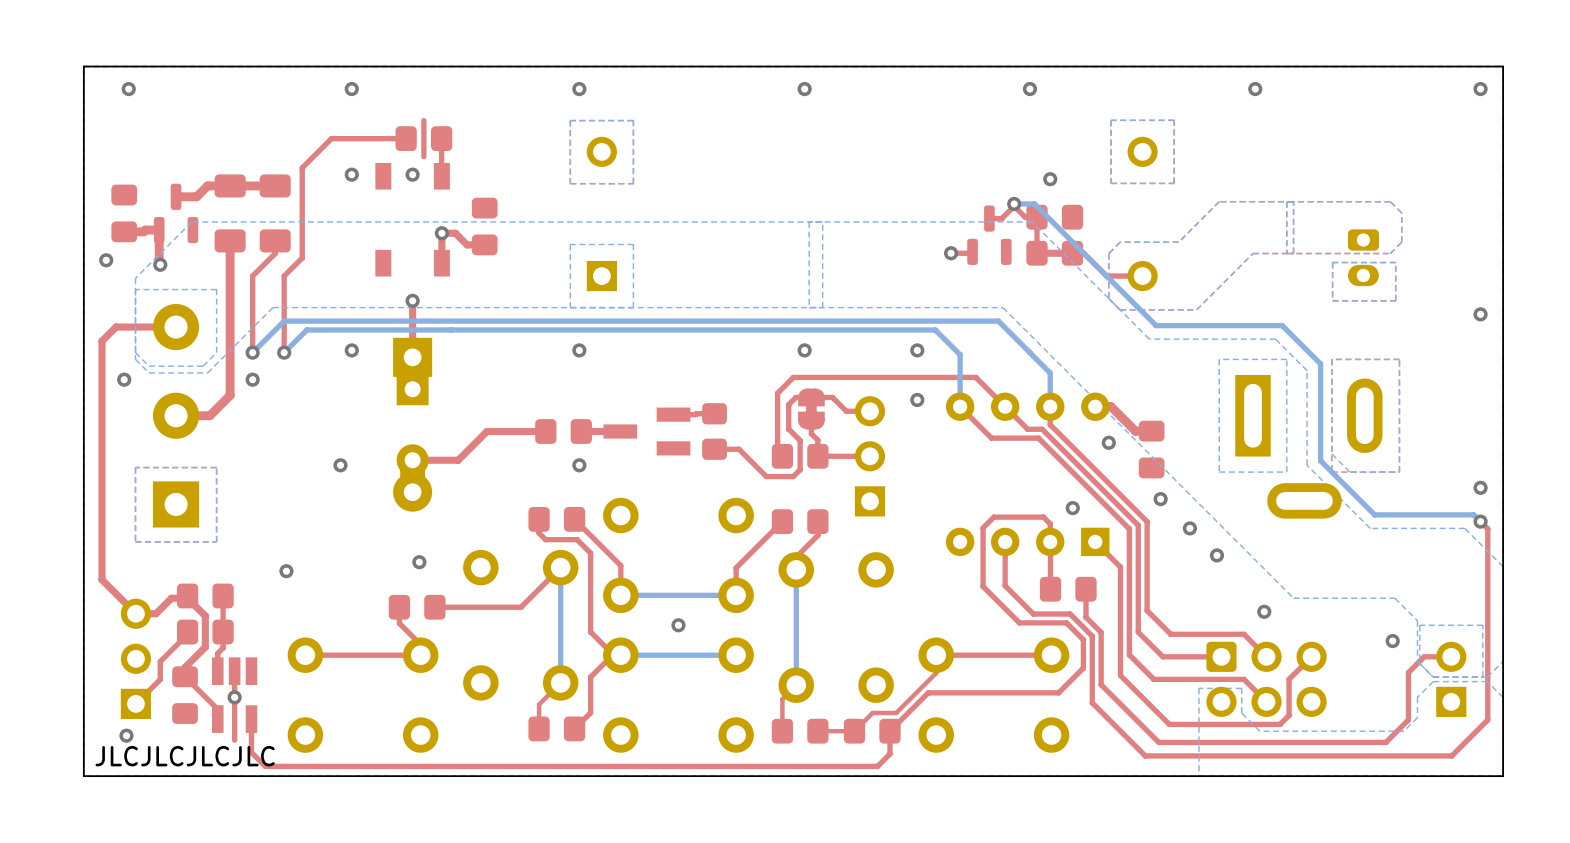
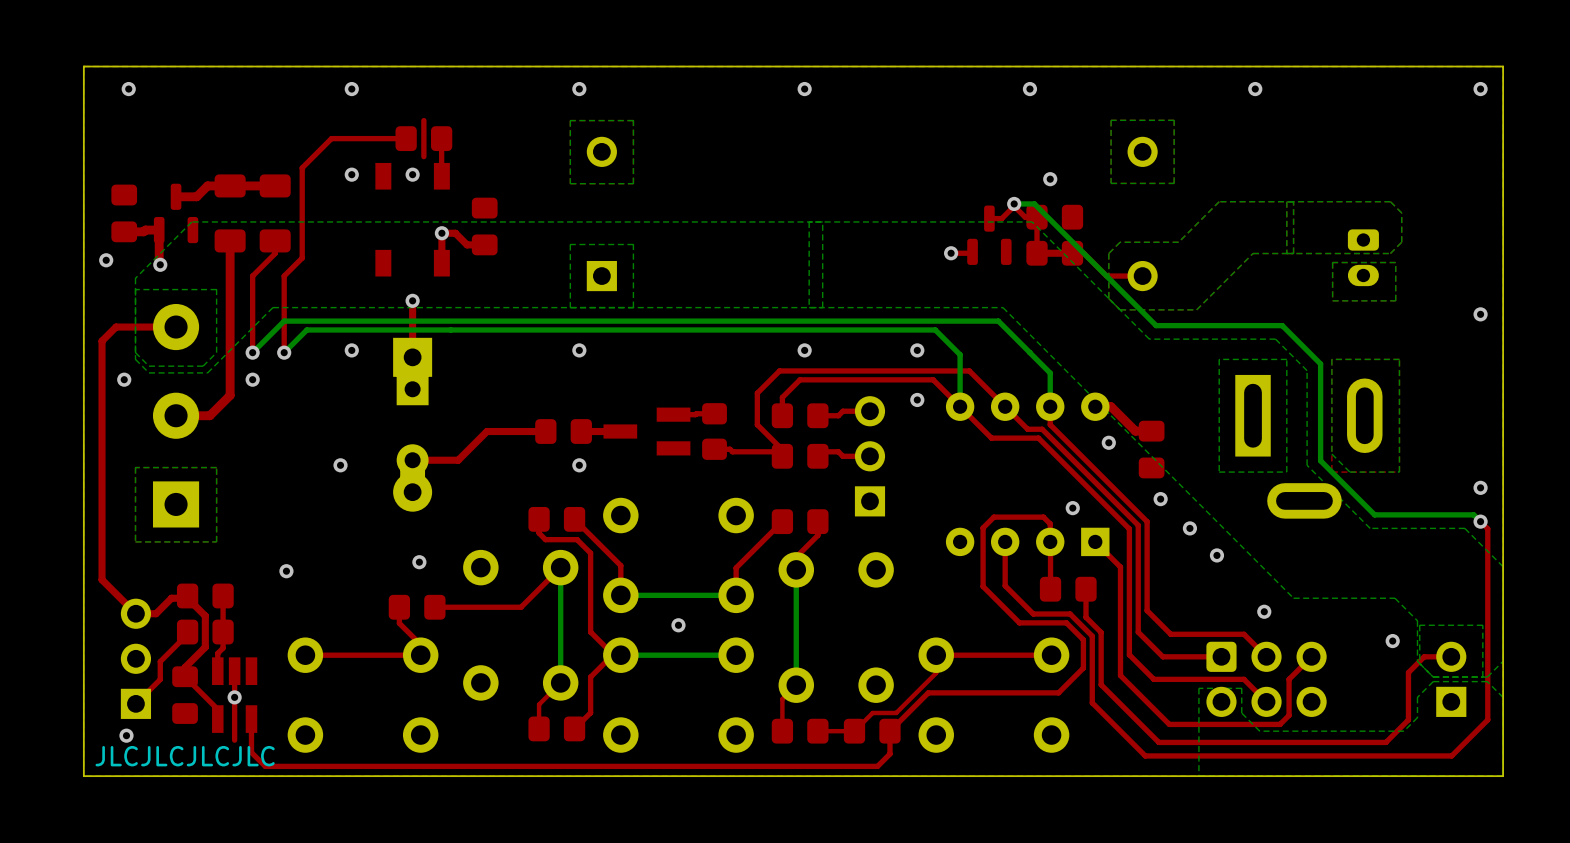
top track: (975, 377) (793, 377) (777, 393) (777, 451) (782, 456) -> (975, 377) (969, 370) (779, 370) (757, 393) (757, 424) (782, 451) (732, 451) (730, 449)
part footprint: [798, 388, 825, 430] -> [771, 403, 829, 429]
top track: none -> (960, 406) (933, 379) (800, 379) (782, 397) (782, 415)
top track: (846, 411) (832, 397) (795, 397) (788, 404) (788, 429) (800, 440) (800, 469) (793, 476) (766, 476) (739, 449) (730, 449) -> (846, 411) (842, 411) (838, 415) (817, 415)
top track: (811, 420) (811, 433) (817, 440) (817, 456) (842, 456) -> (817, 451) (838, 451) (842, 456)

